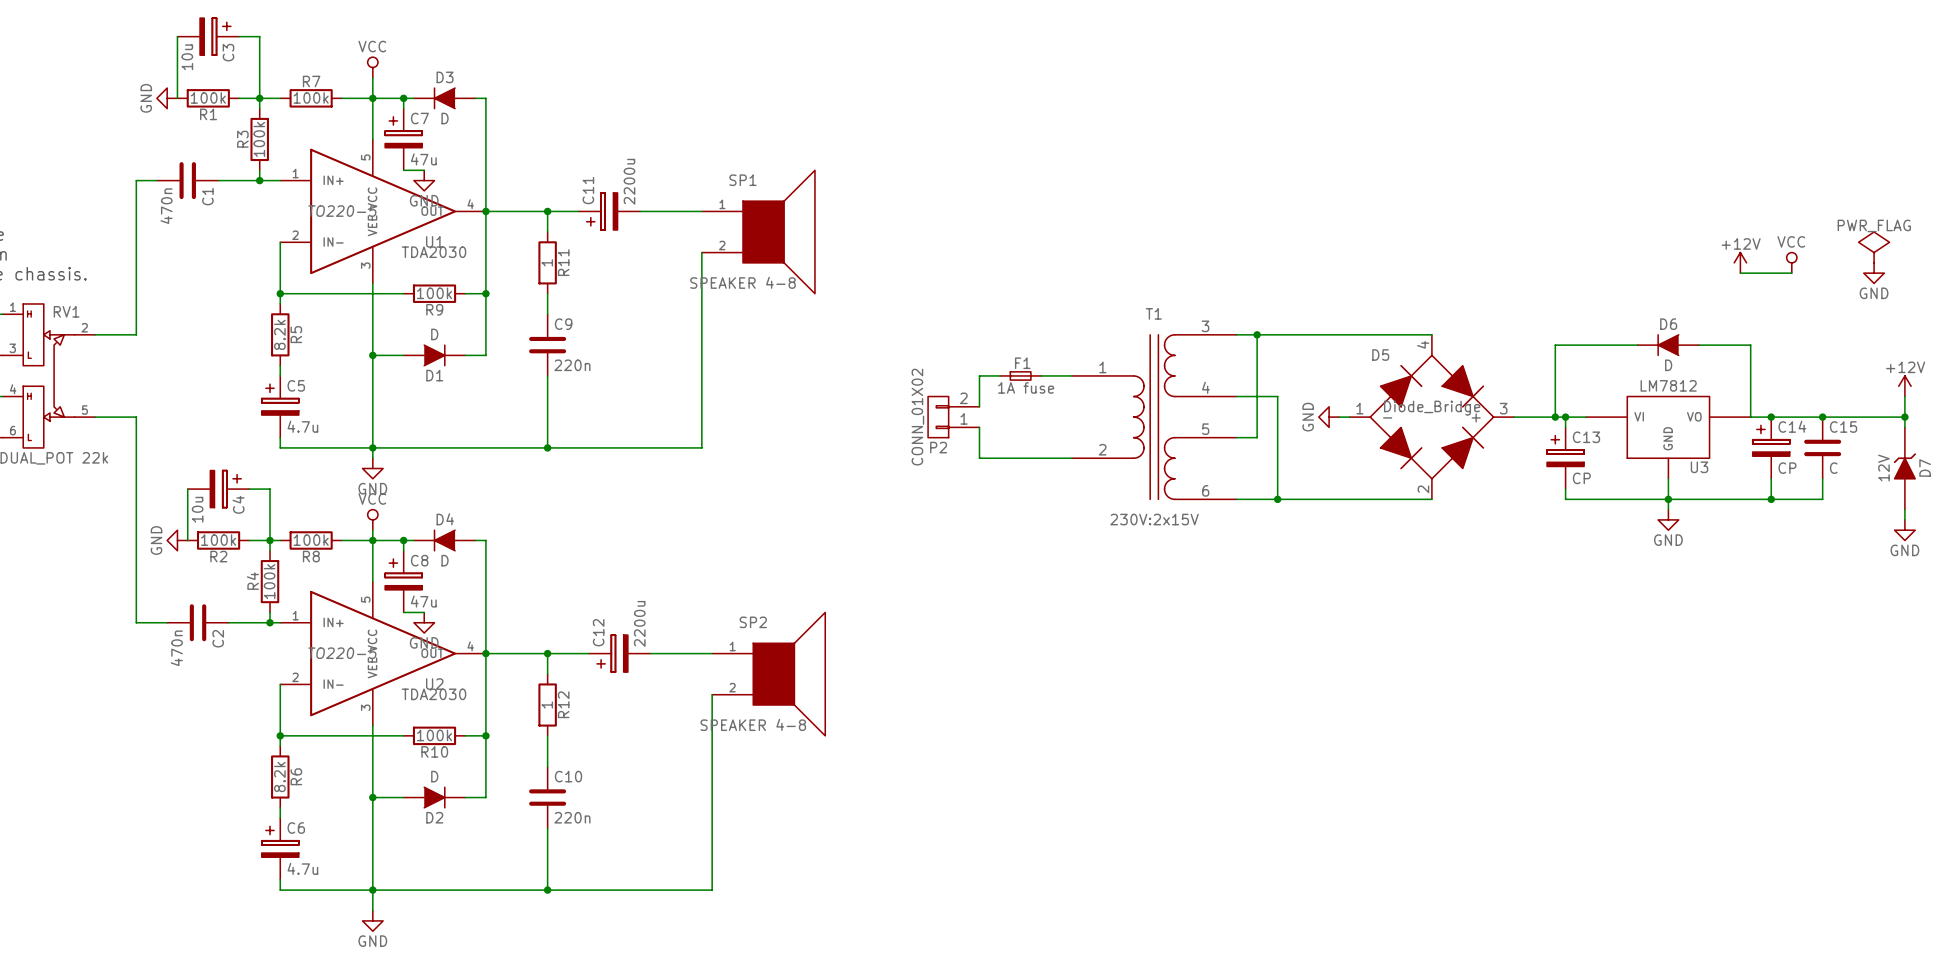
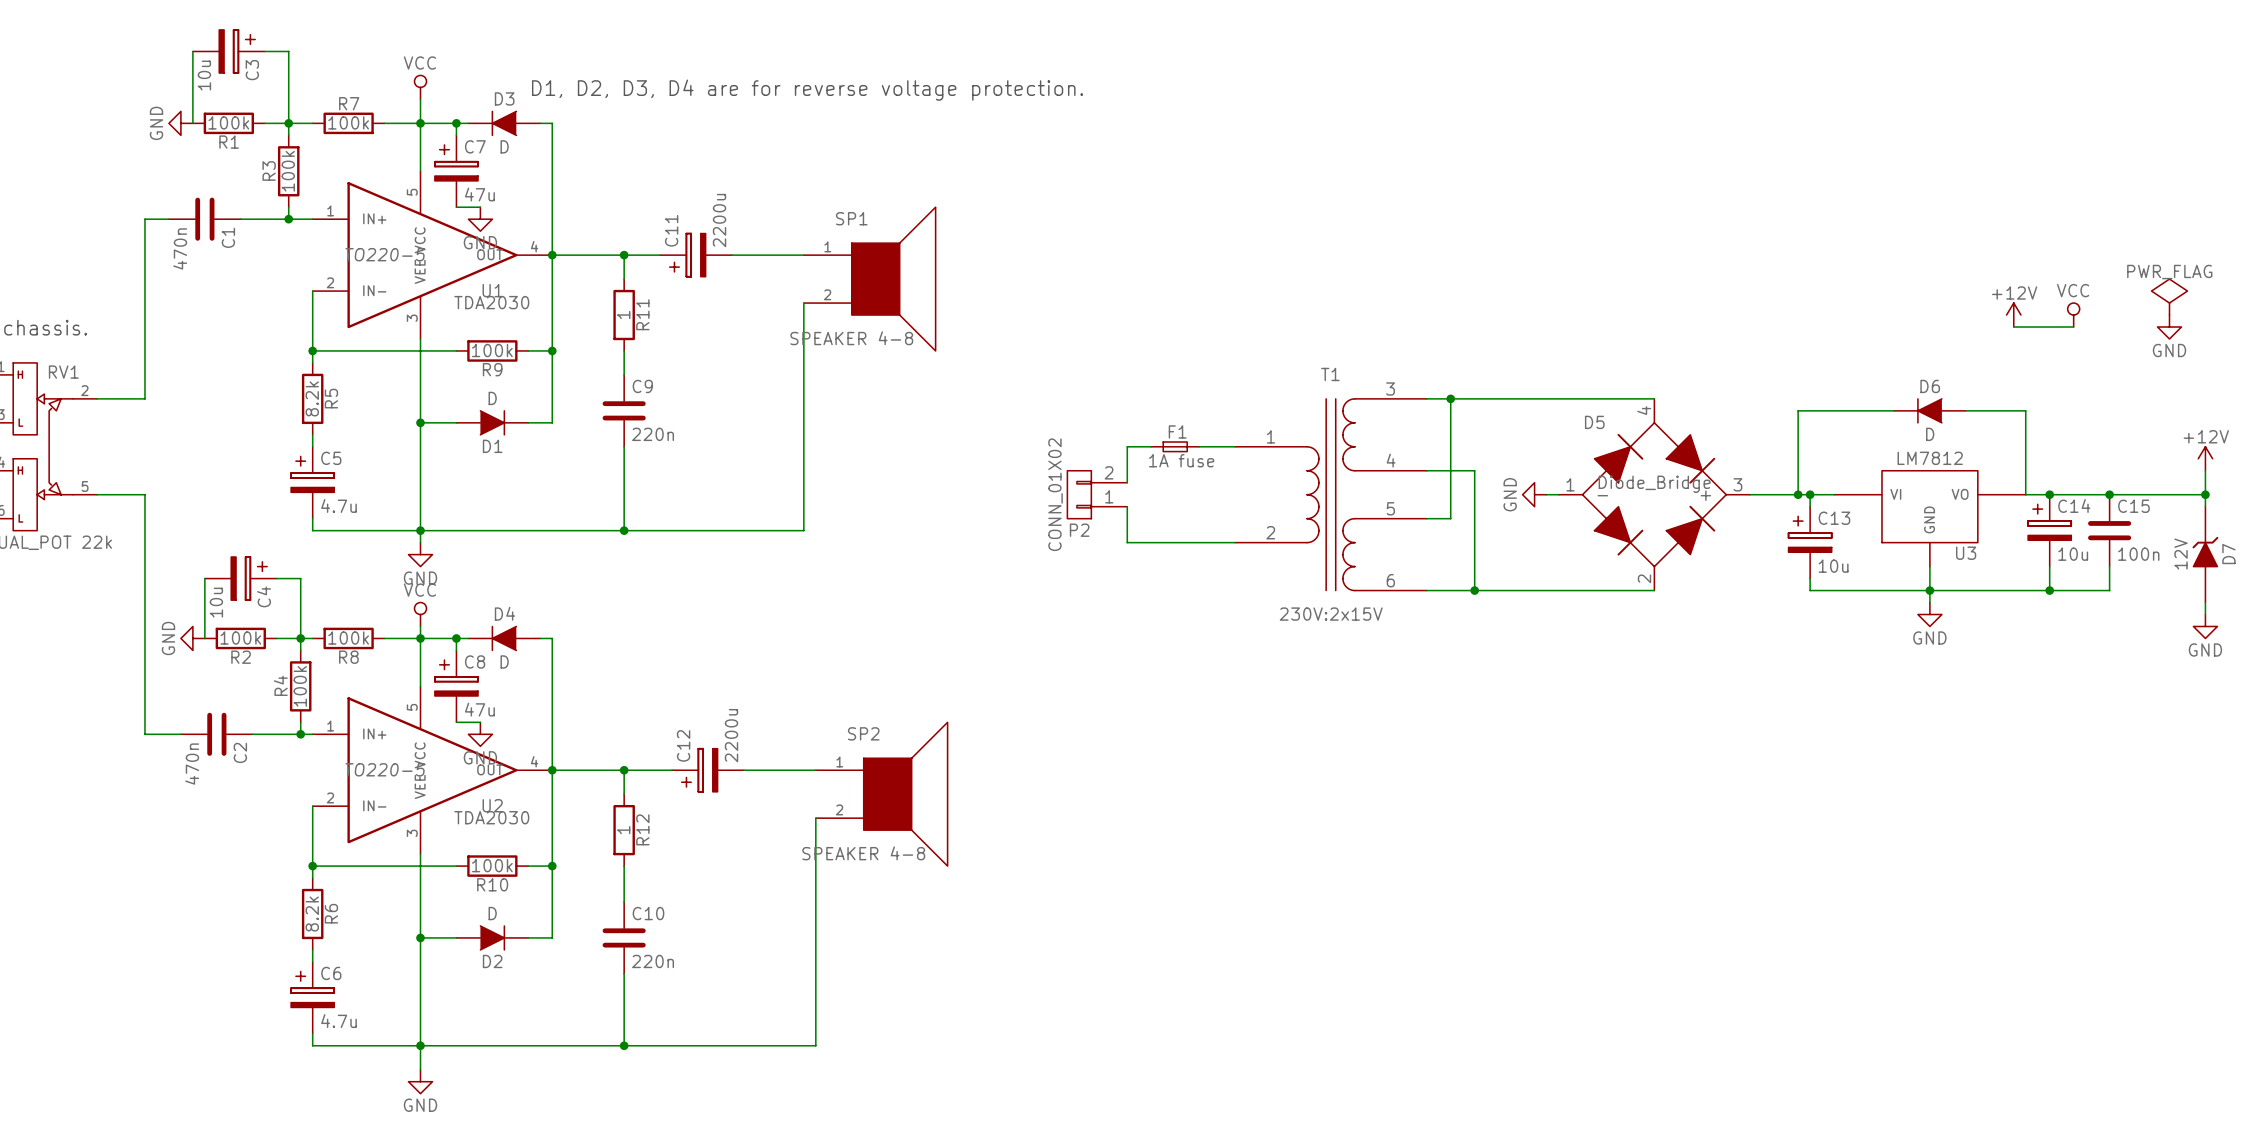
text: none -> D1, D2, D3, D4 are for reverse voltage protection. (807, 90)
C14 value: CP (1787, 468) -> 10u (2073, 554)
C15 value: C (1833, 468) -> 100n (2138, 554)
C13 value: CP (1581, 478) -> 10u (1833, 566)

